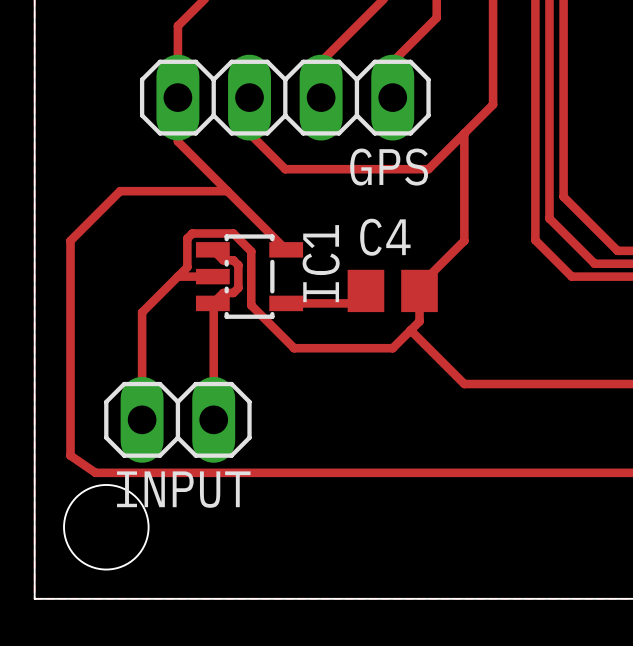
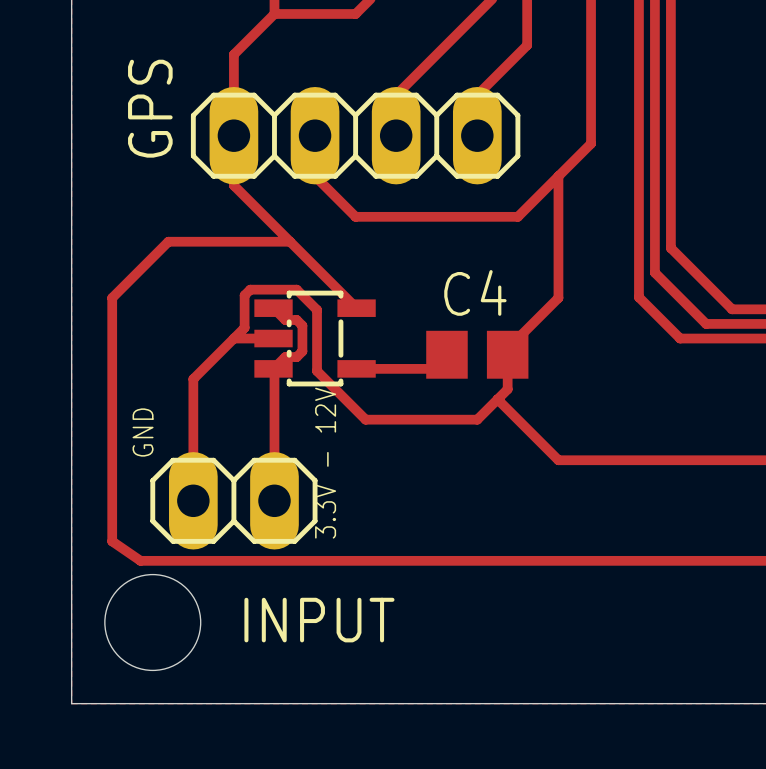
GPS name rotation: 0° (389, 167) -> 90° counterclockwise (150, 108)
GPS name position: GPS (389, 167) -> GPS (150, 108)
IC1 name: IC1 (321, 263) -> none
text: none -> GND (143, 432)
text: none -> 3.3V - 12V (325, 463)
INPUT name position: INPUT (183, 489) -> INPUT (319, 620)

